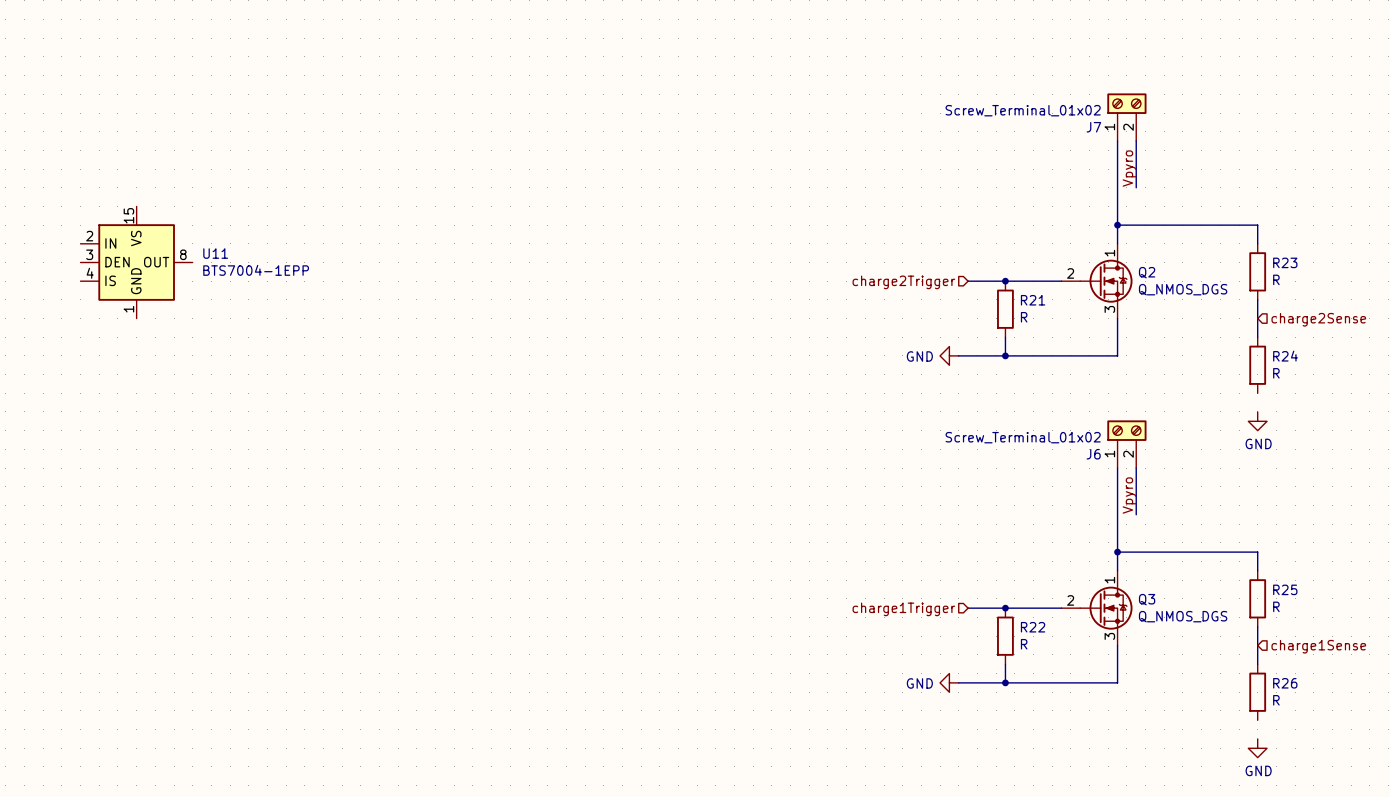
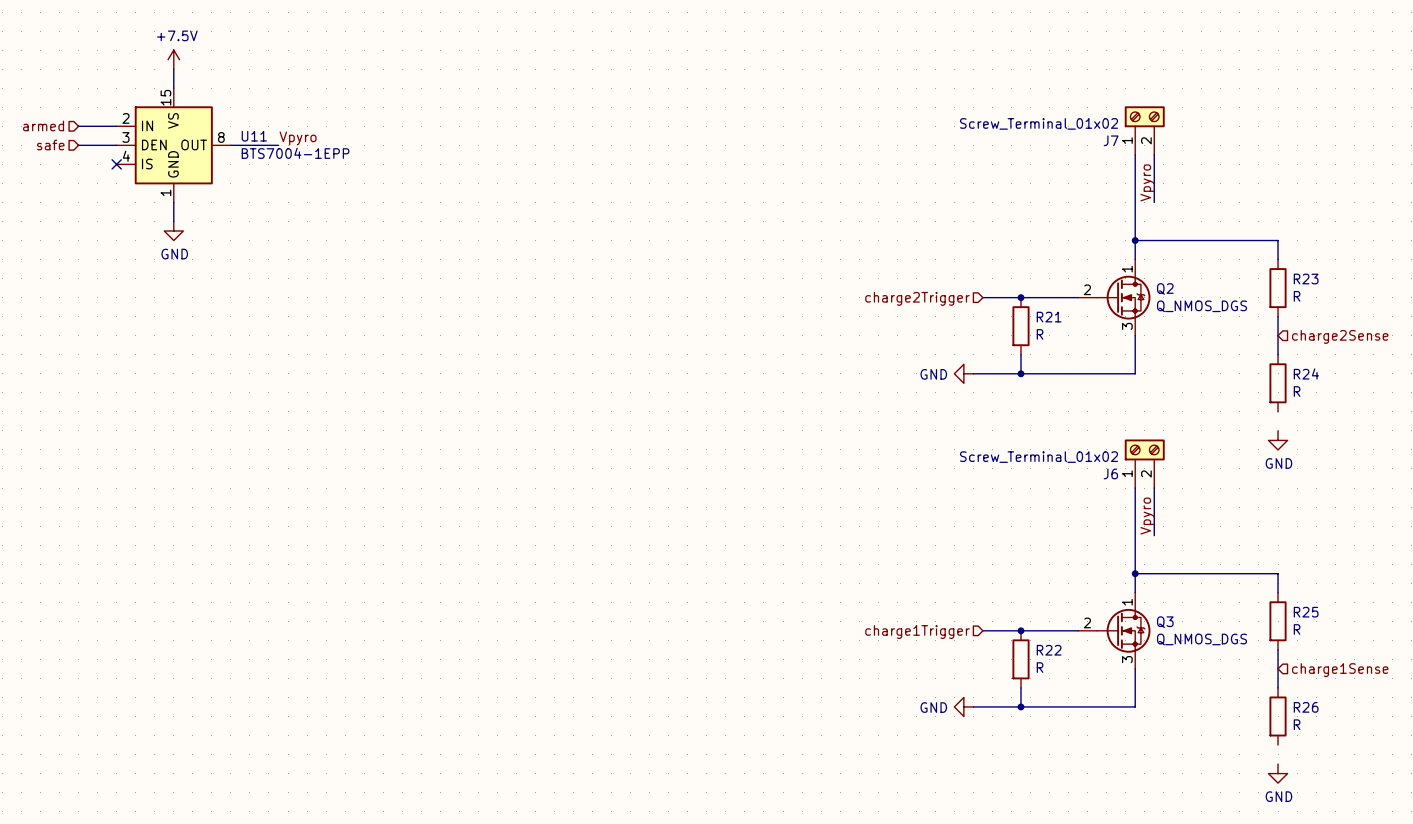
power symbol: none -> +7.5V (173, 59)
wire: none -> (173, 69) (173, 88)
hierarchical label: none -> armed (43, 125)
wire: none -> (78, 126) (116, 126)
label: none -> Vpyro (298, 138)
hierarchical label: none -> safe (50, 144)
wire: none -> (78, 145) (116, 145)
wire: none -> (230, 145) (278, 145)
no-connect mark: none -> (116, 164)
wire: none -> (173, 202) (173, 221)
power symbol: none -> GND (173, 231)
U11 position: (136, 262) -> (173, 145)

